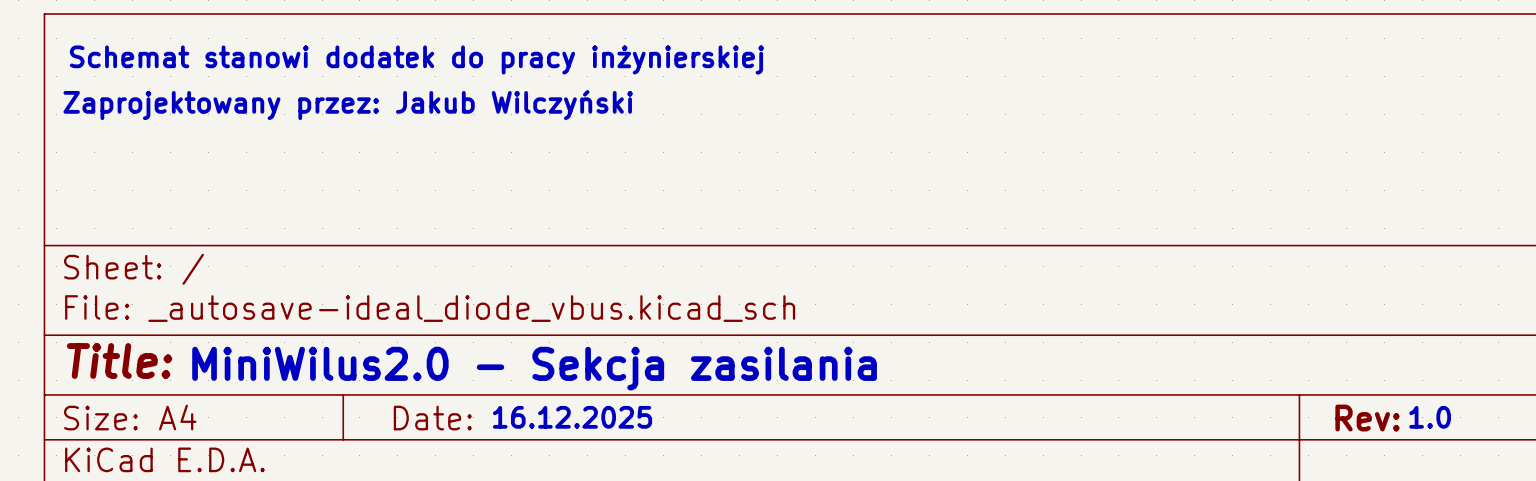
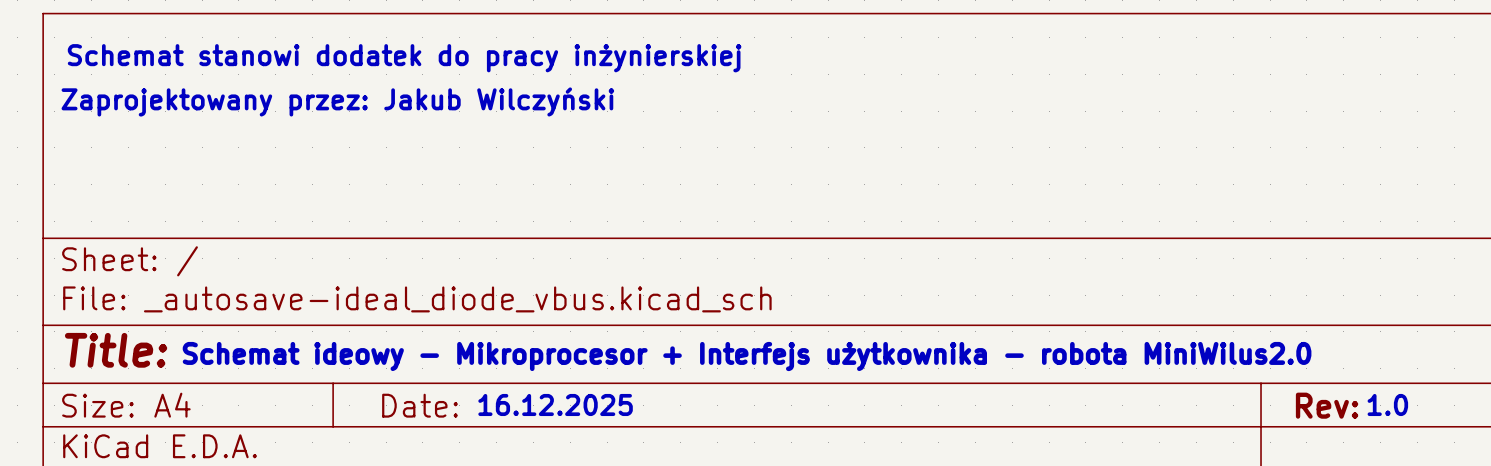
text: none -> Schemat ideowy - Mikroprocesor + Interfejs użytkownika - robota MiniWilus2.0 (747, 356)
text: MiniWilus2.0 - Sekcja zasilania (534, 368) -> none

